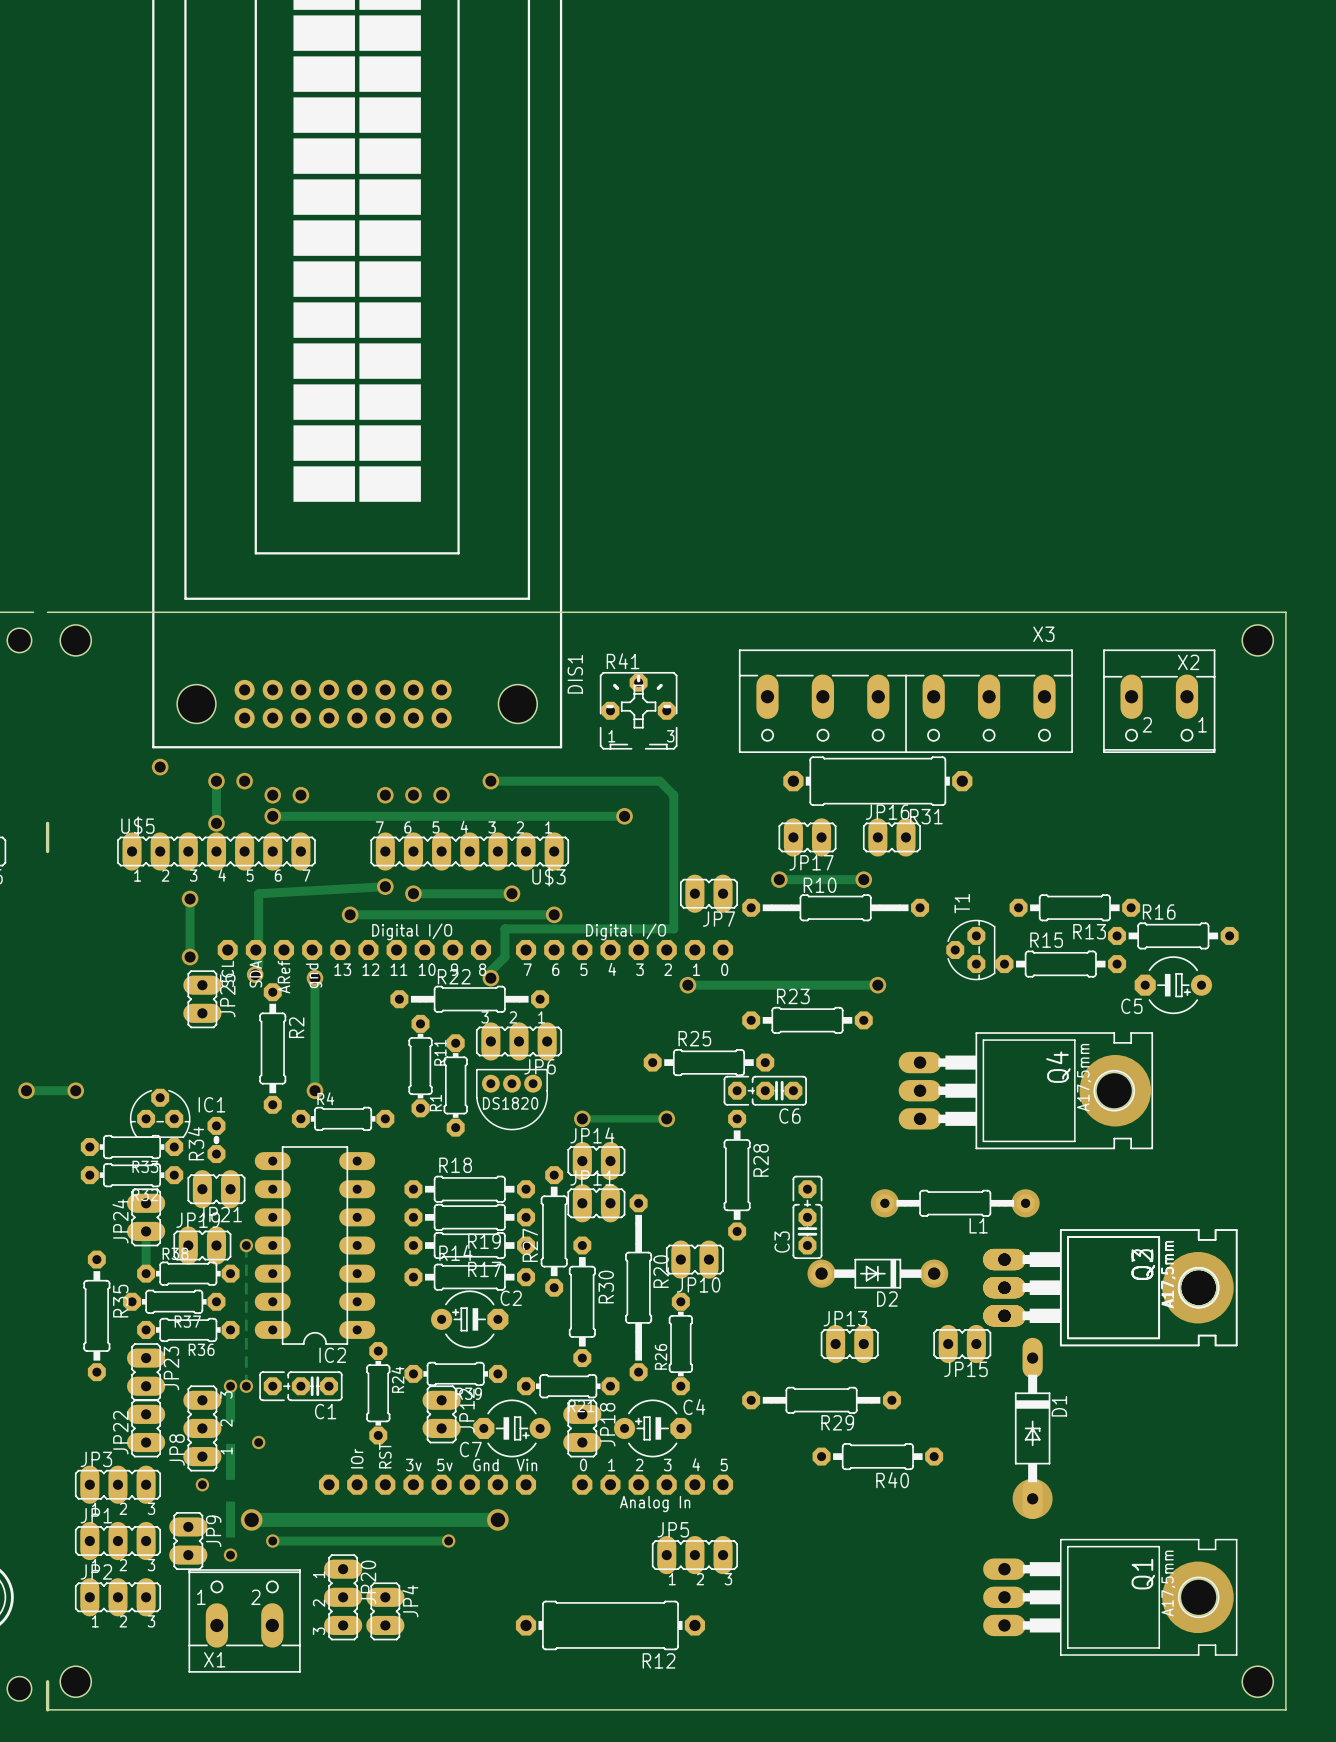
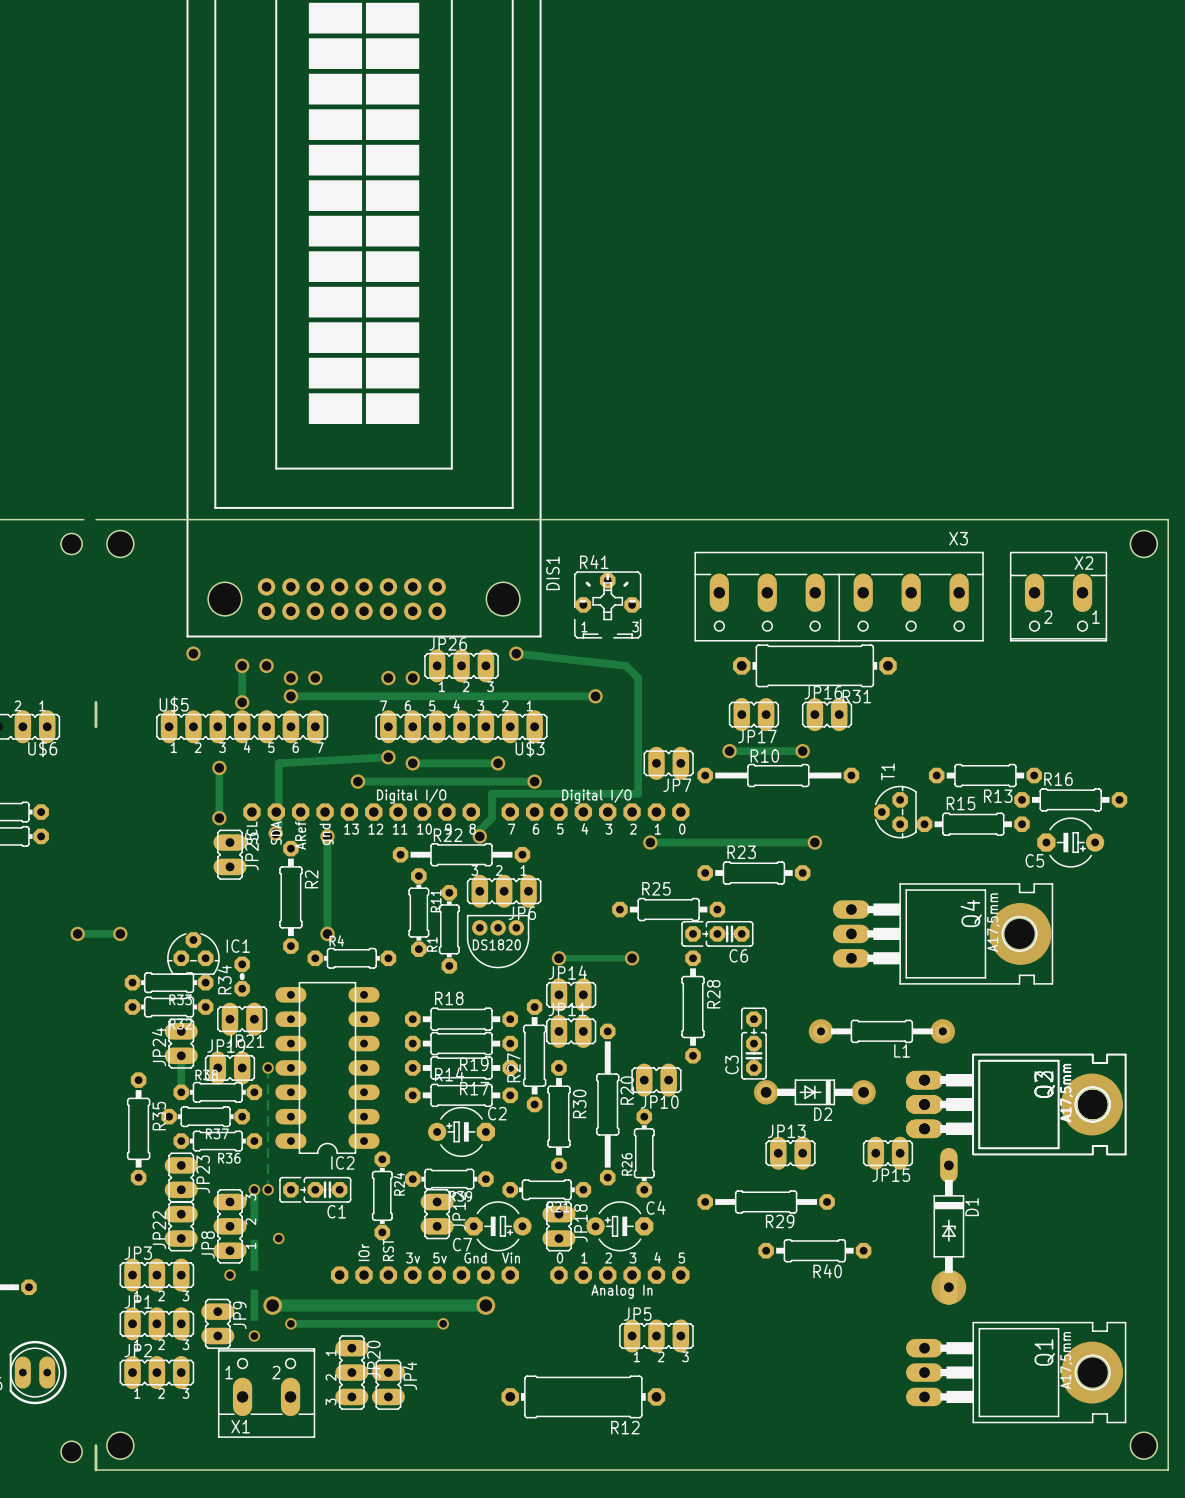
JP26: none -> (461, 665)
track: (490, 781) (659, 781) -> (516, 653) (626, 665)
via position: (490, 781) -> (516, 653)
via: (441, 795) -> none

